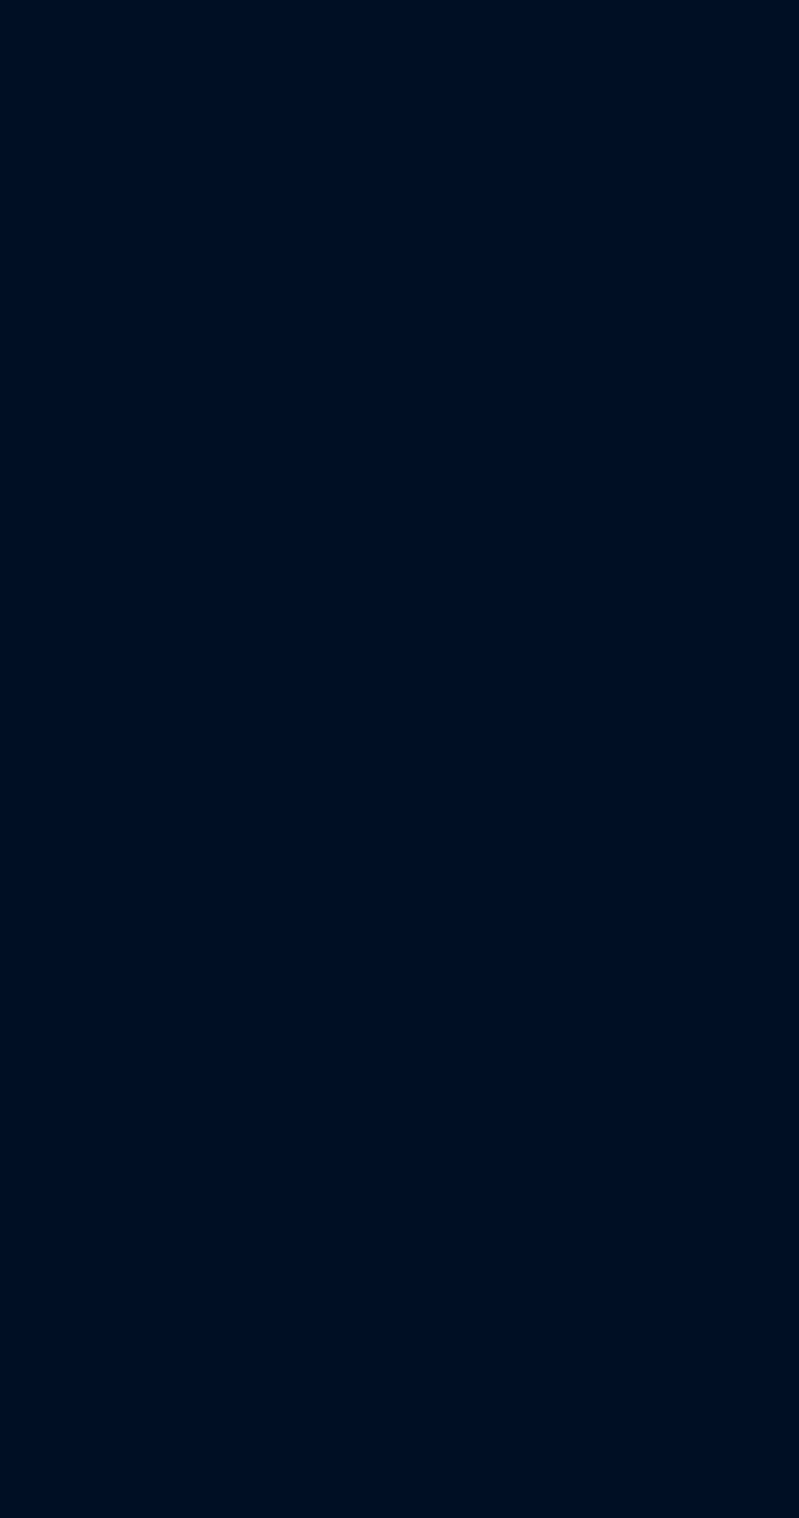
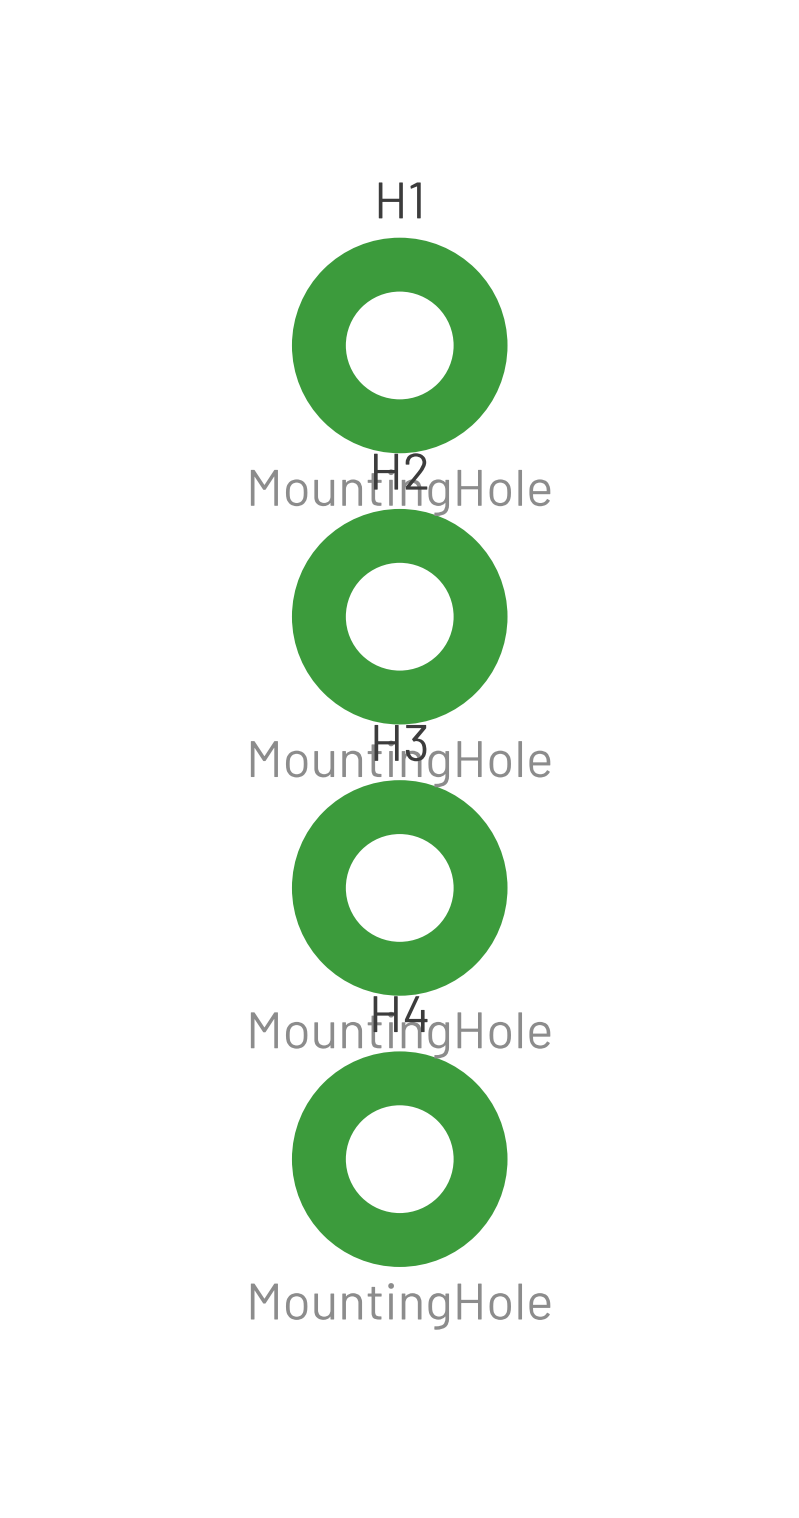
H1: none -> MountingHole (399, 345)
H2: none -> MountingHole (399, 616)
H3: none -> MountingHole (399, 887)
H4: none -> MountingHole (399, 1159)

